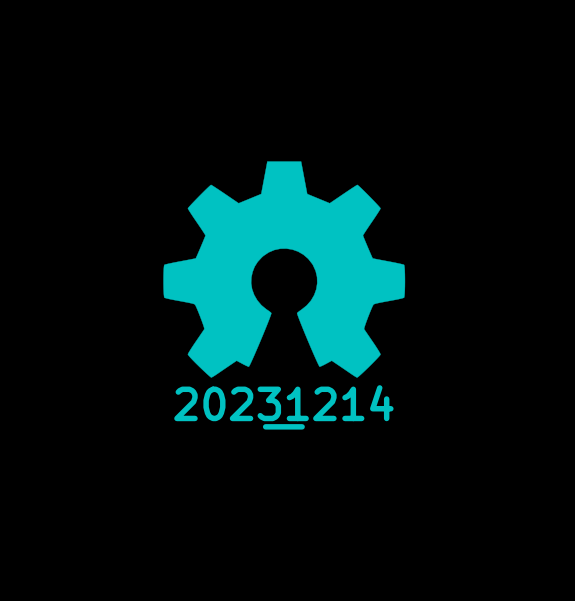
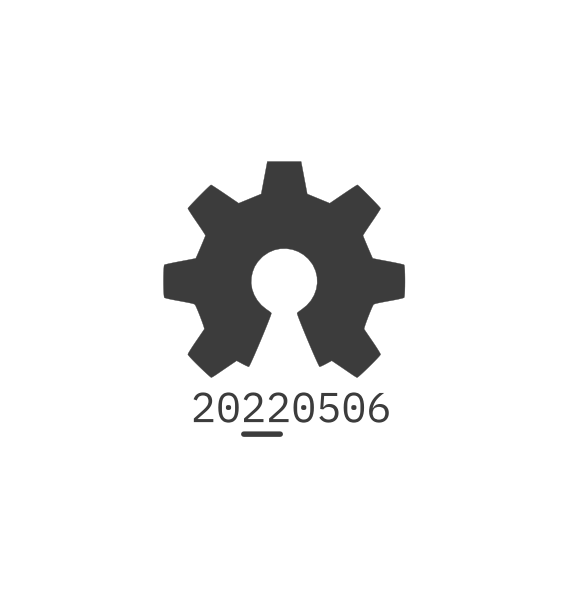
drawing shape: [174, 385, 394, 430] -> [193, 392, 389, 437]

